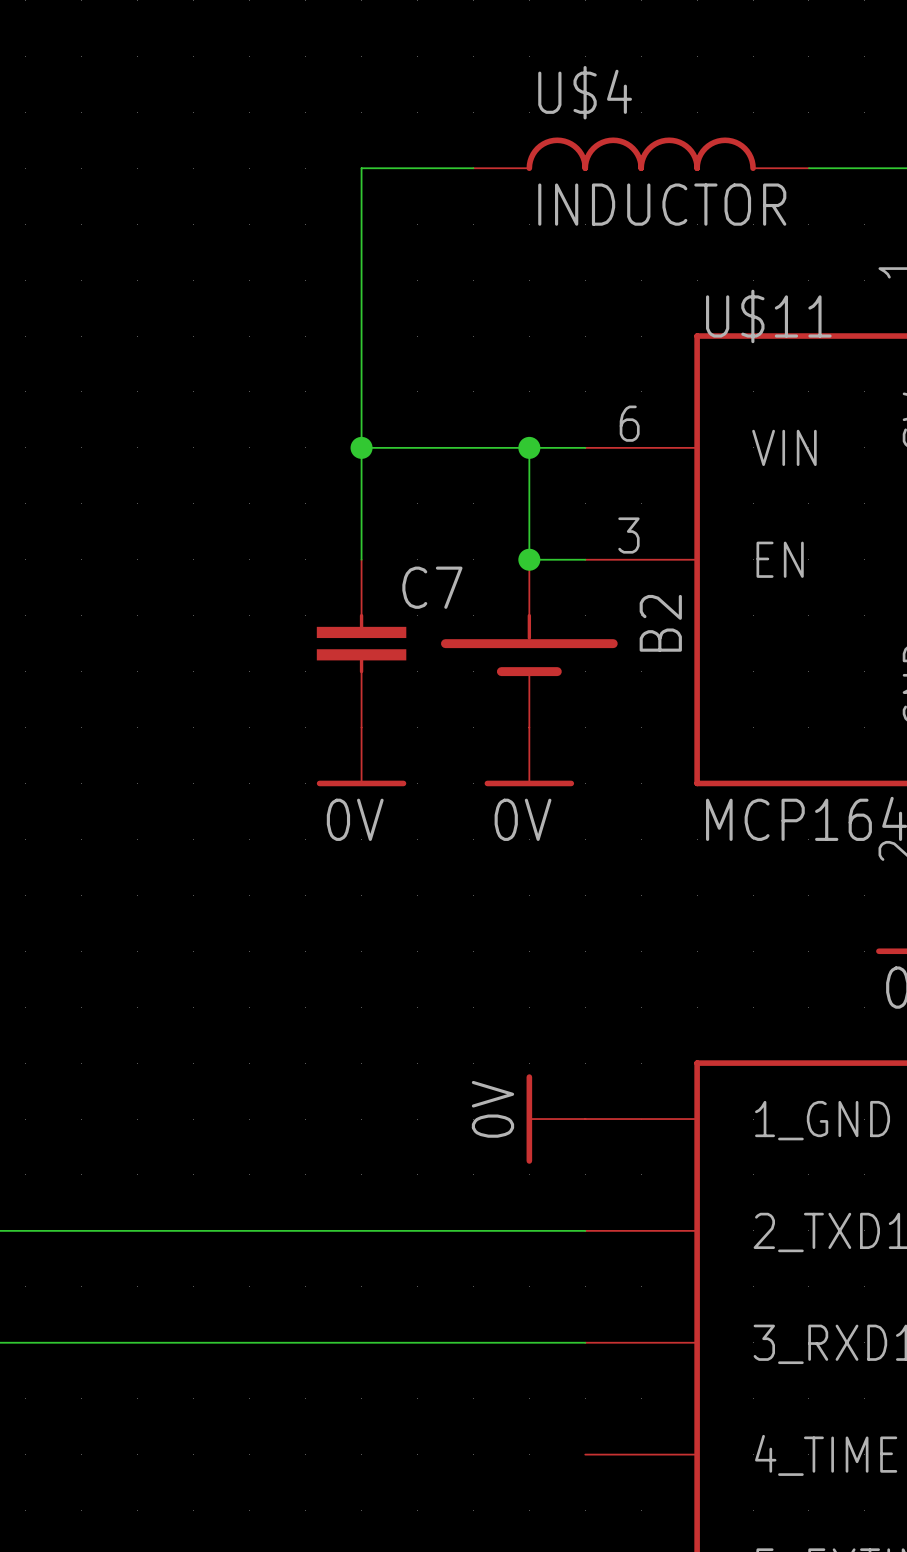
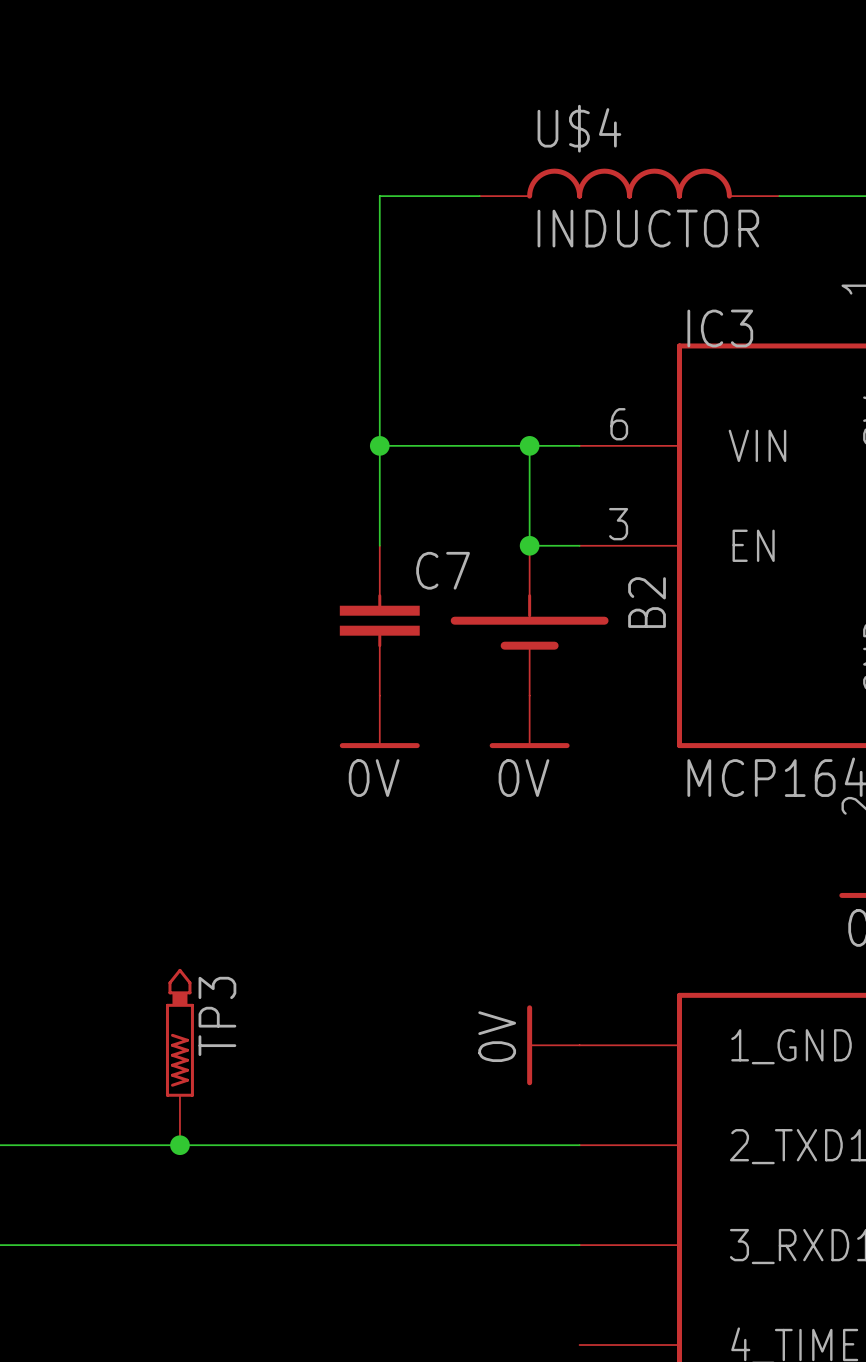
U$11 name: U$11 (768, 316) -> IC3 (720, 328)
TP3: none -> (179, 1057)
junction: none -> (179, 1145)

